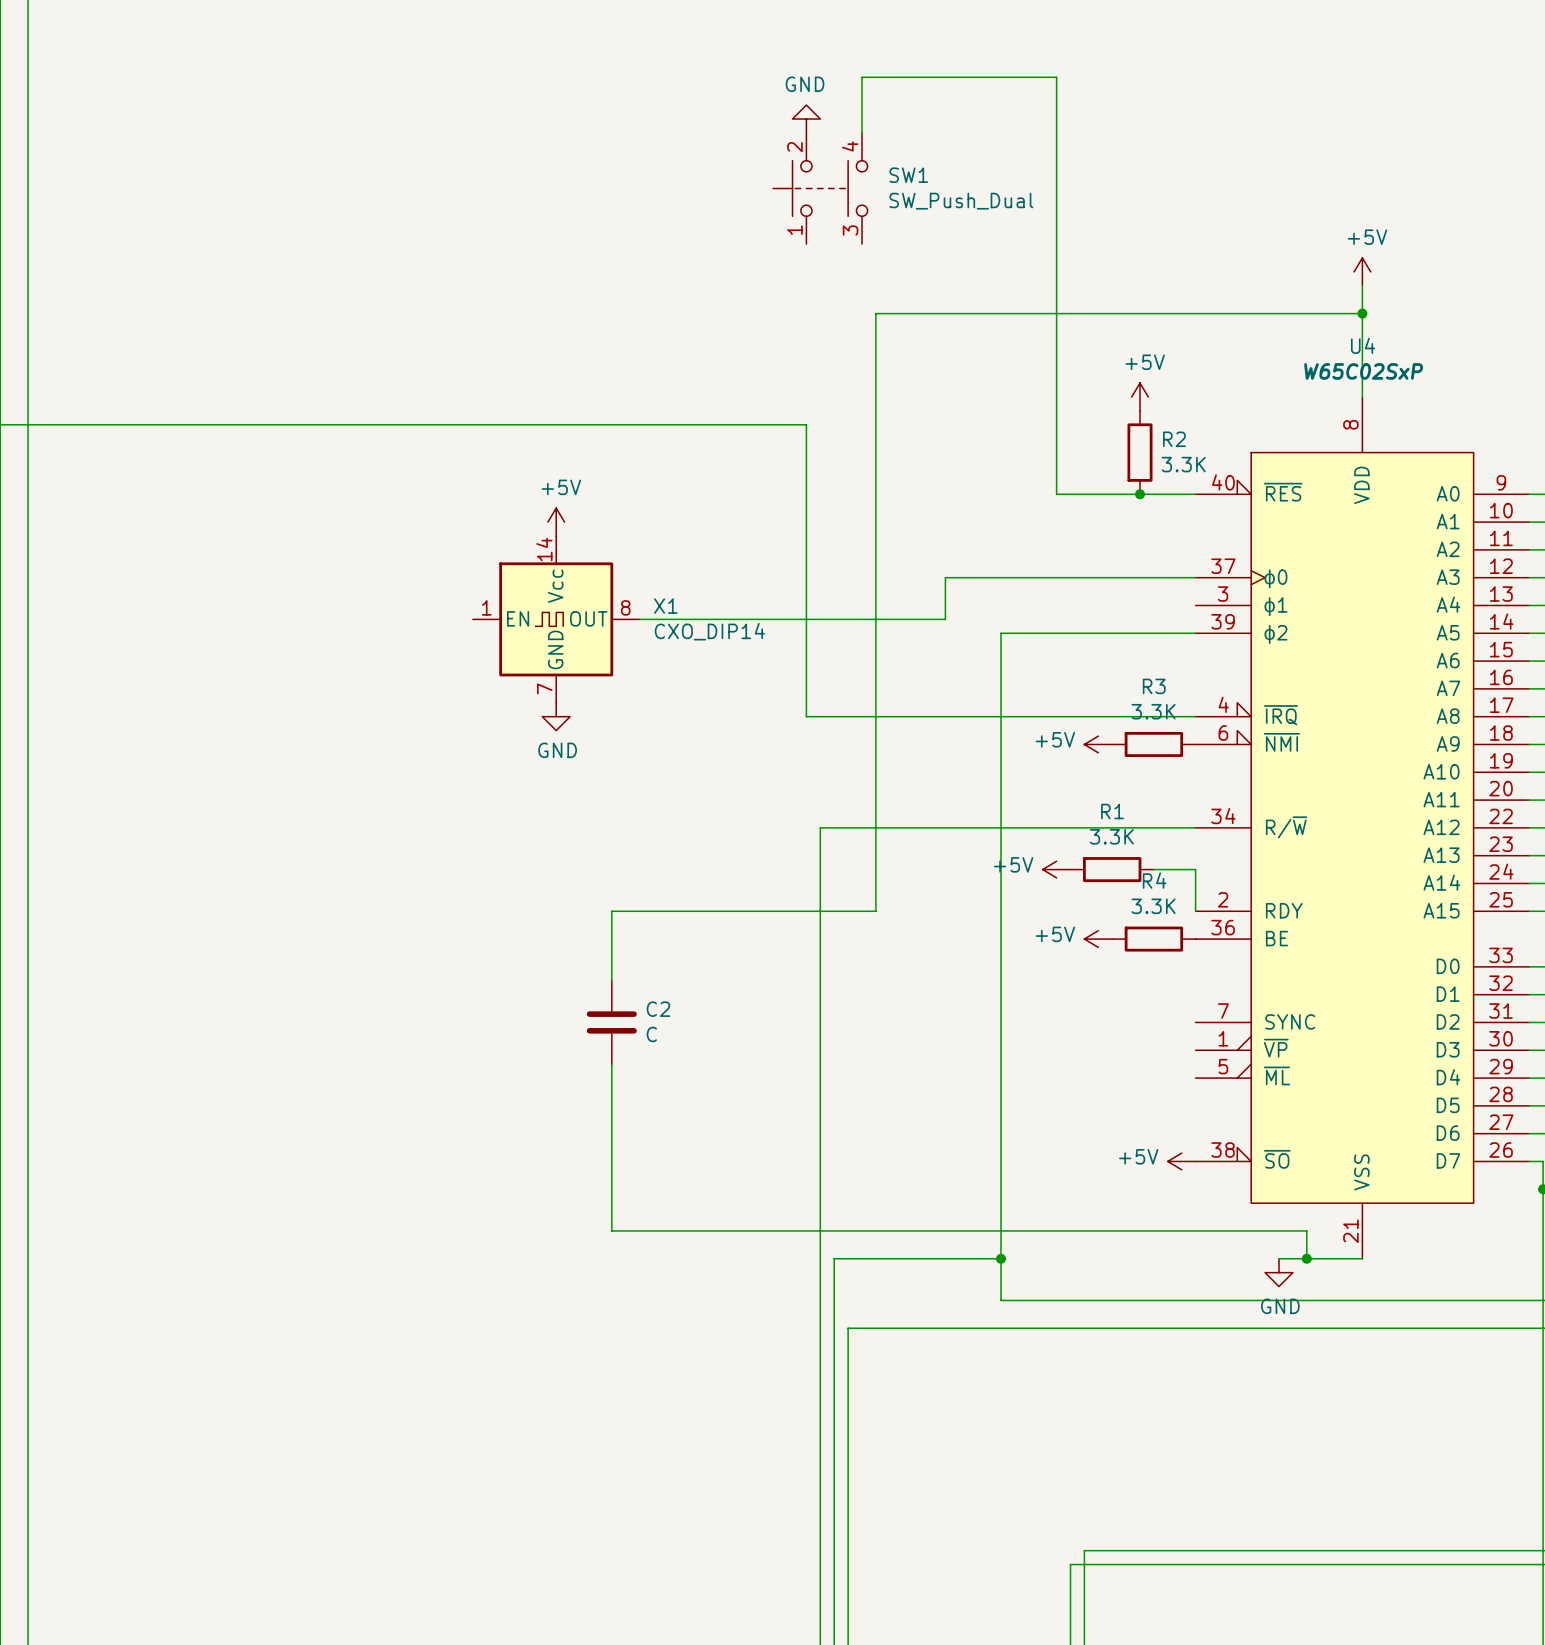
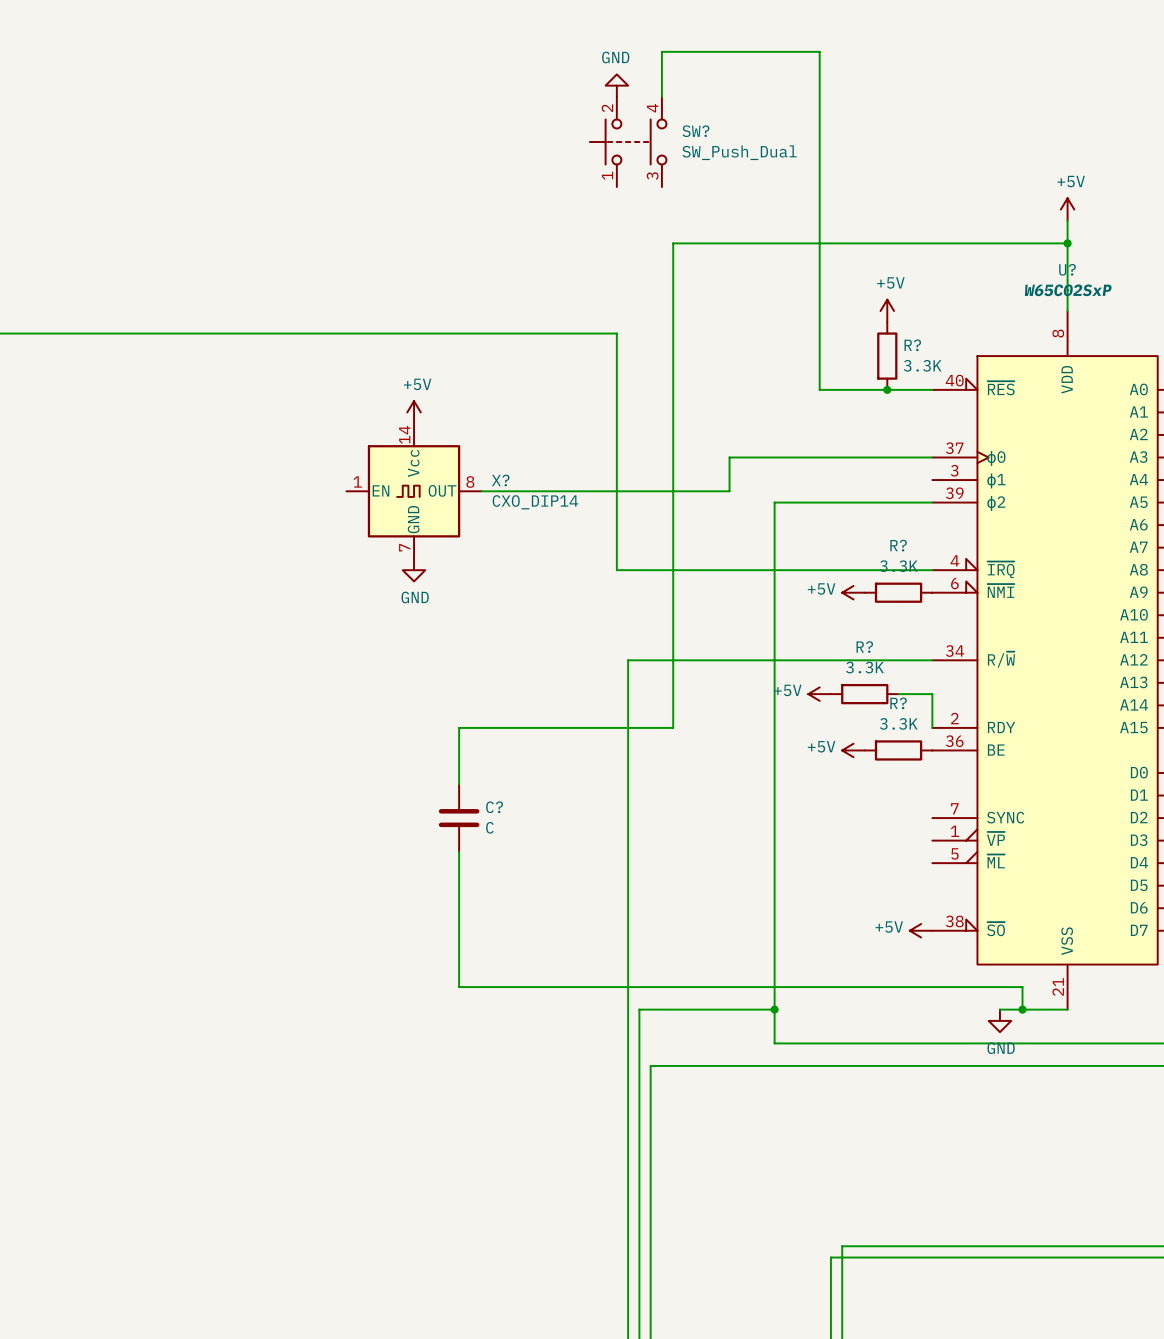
SW1 name: SW1 (908, 175) -> SW? (695, 131)
U4 name: U4 (1363, 345) -> U? (1067, 269)
R2 name: R2 (1174, 439) -> R? (912, 345)
X1 name: X1 (665, 606) -> X? (500, 480)
R3 name: R3 (1154, 686) -> R? (898, 545)
R1 name: R1 (1112, 811) -> R? (864, 647)
R4 name: R4 (1154, 880) -> R? (898, 703)
C2 name: C2 (658, 1009) -> C? (494, 807)

